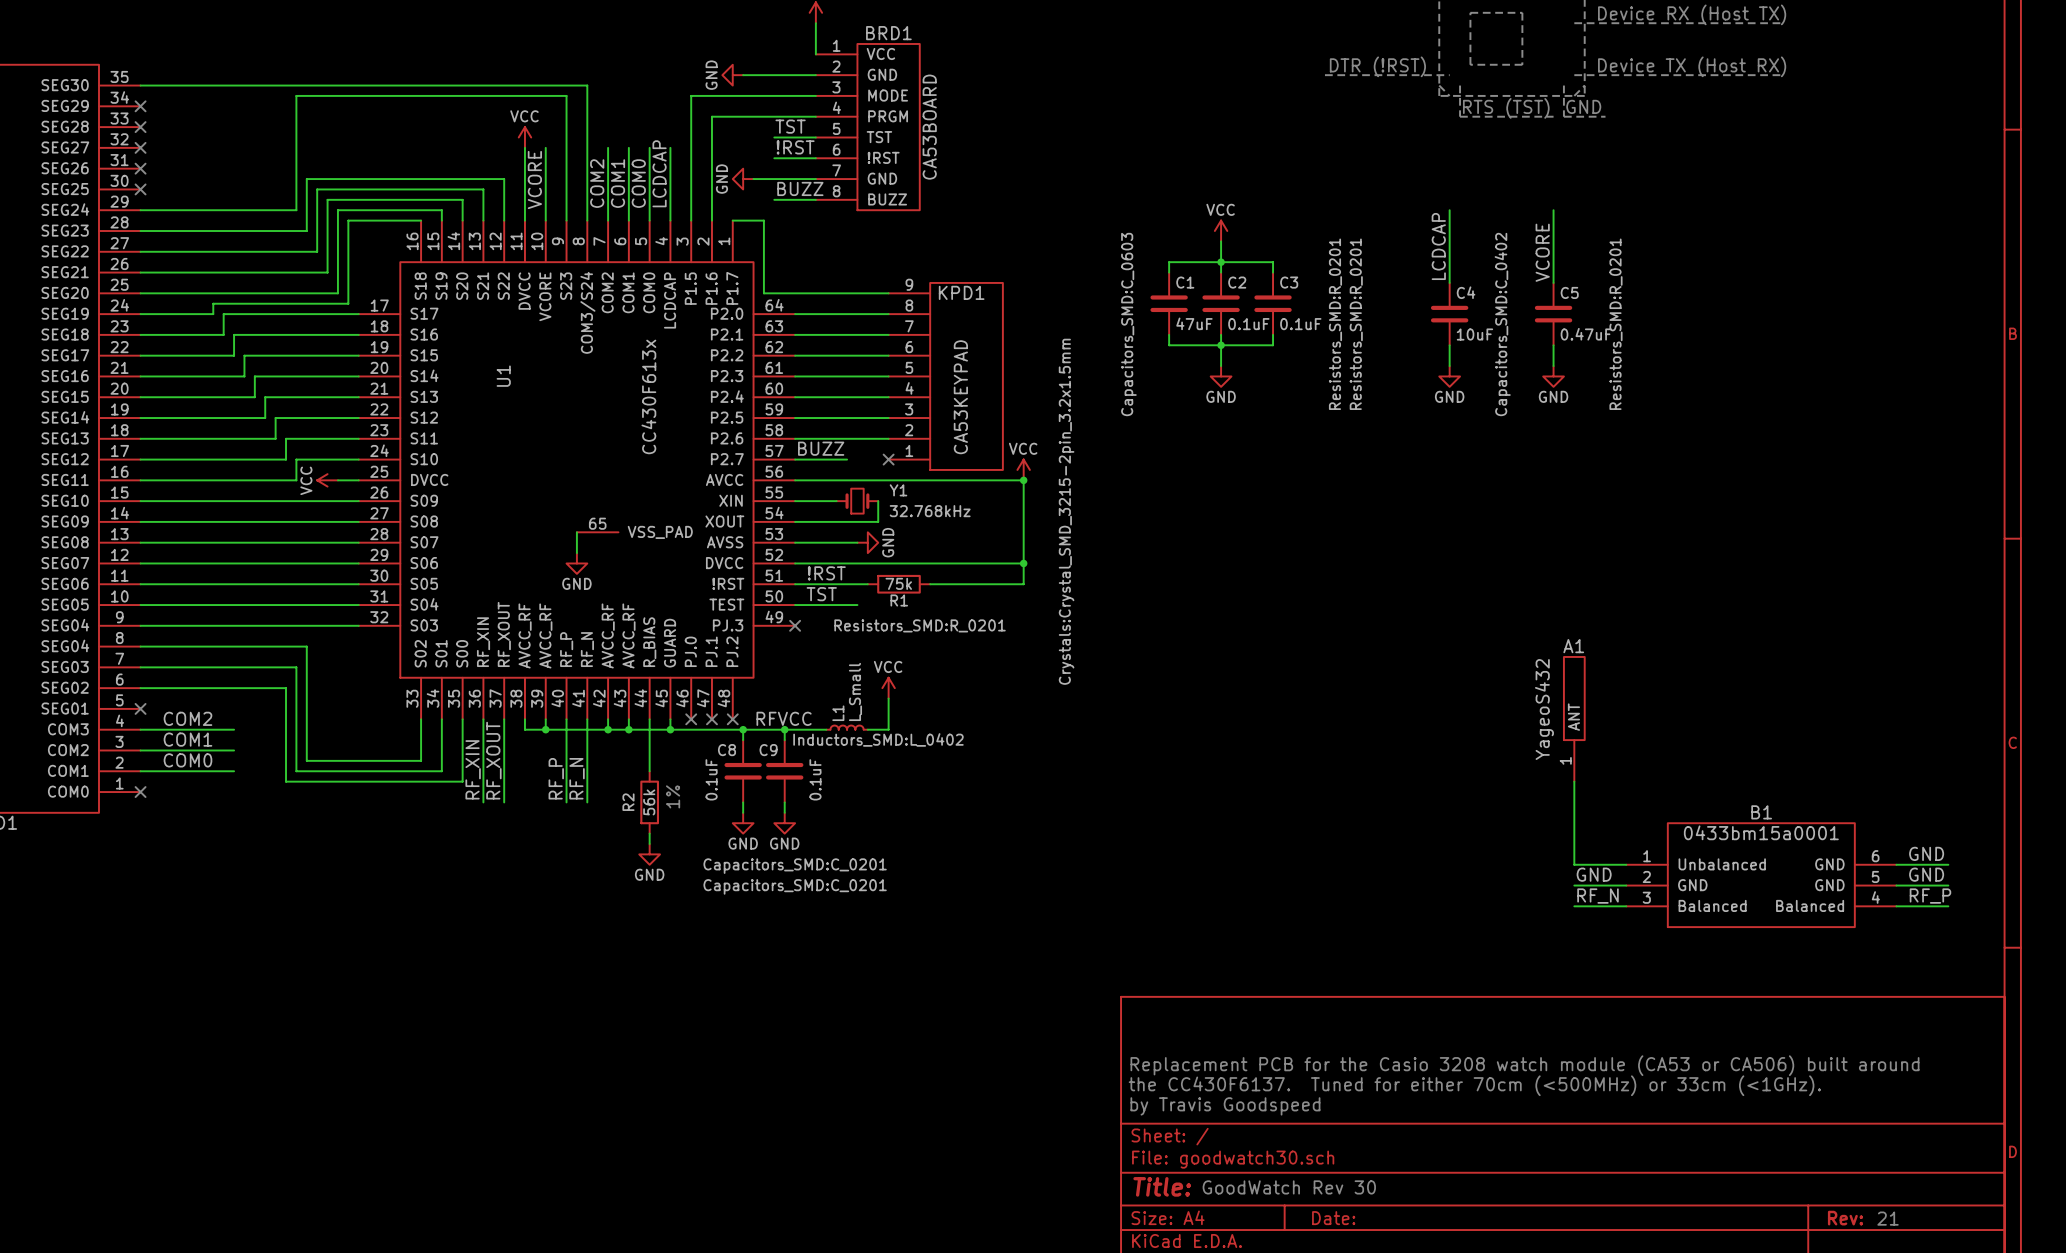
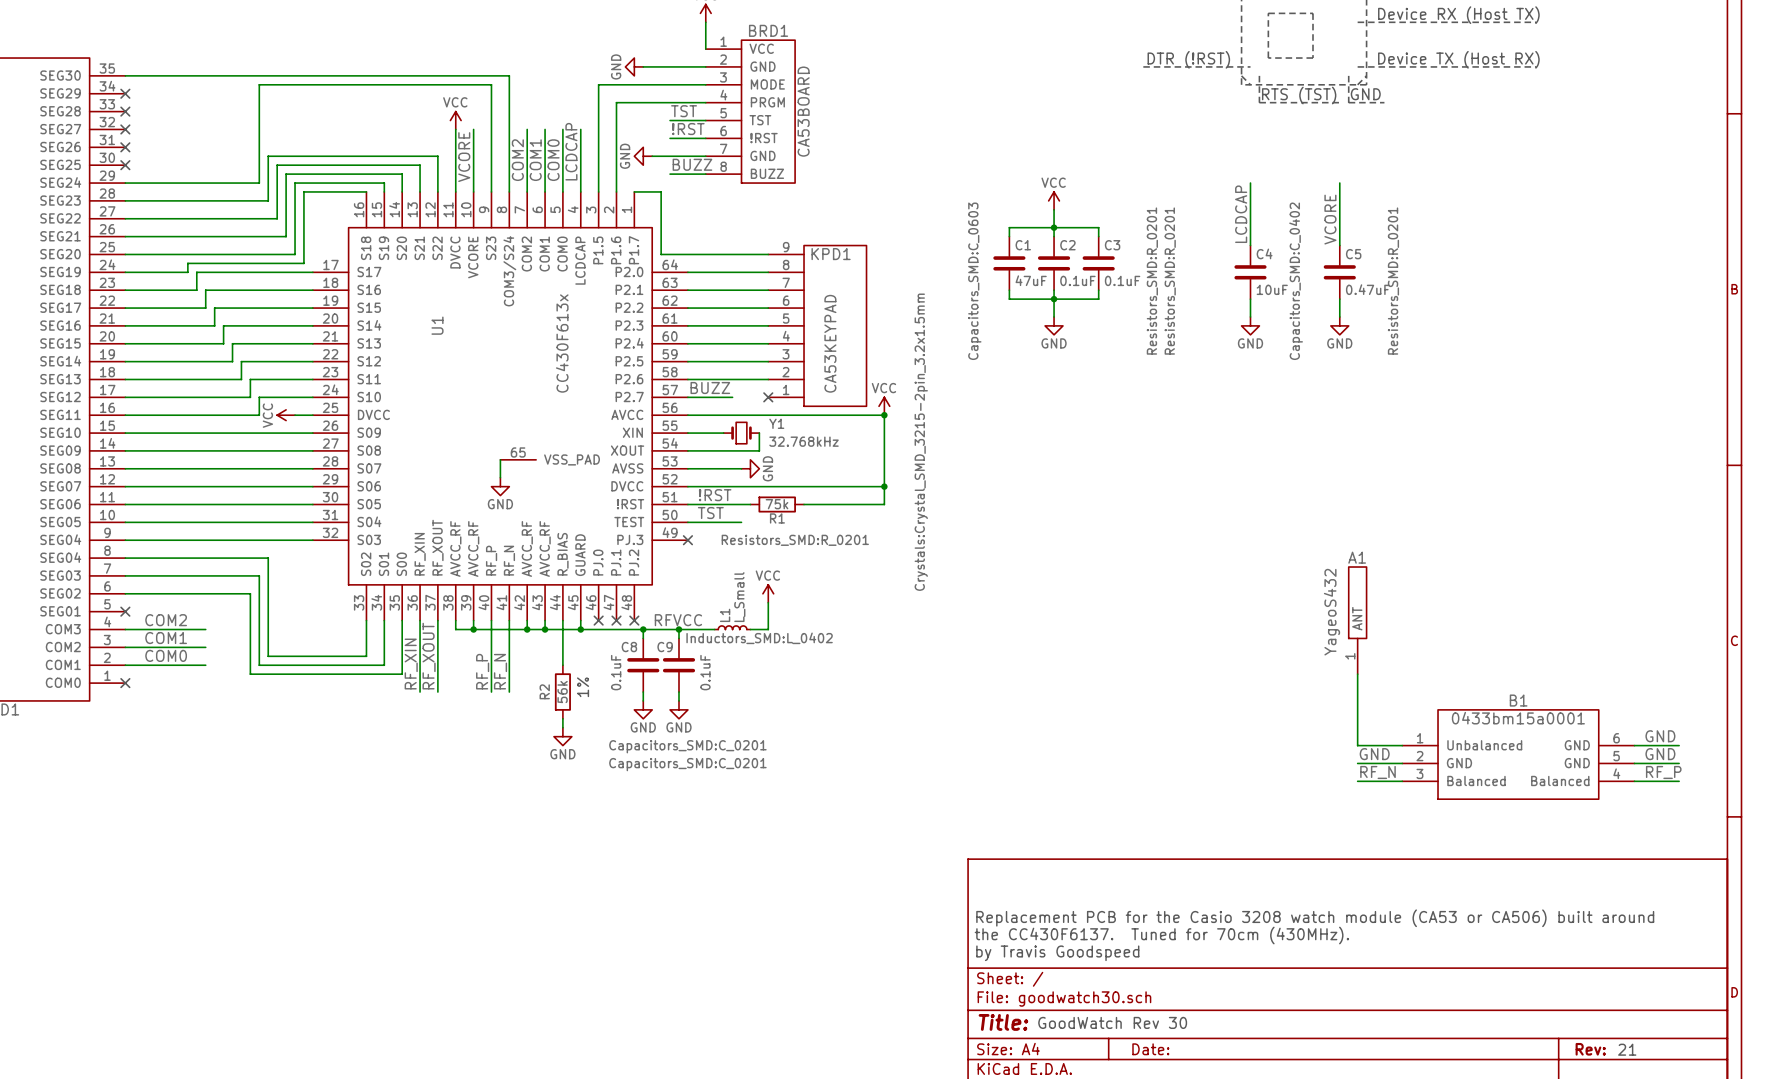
text: the CC430F6137. Tuned for either 70cm (<500MHz) or 33cm (<1GHz). (1474, 1085) -> the CC430F6137. Tuned for 70cm (430MHz). (1161, 935)

